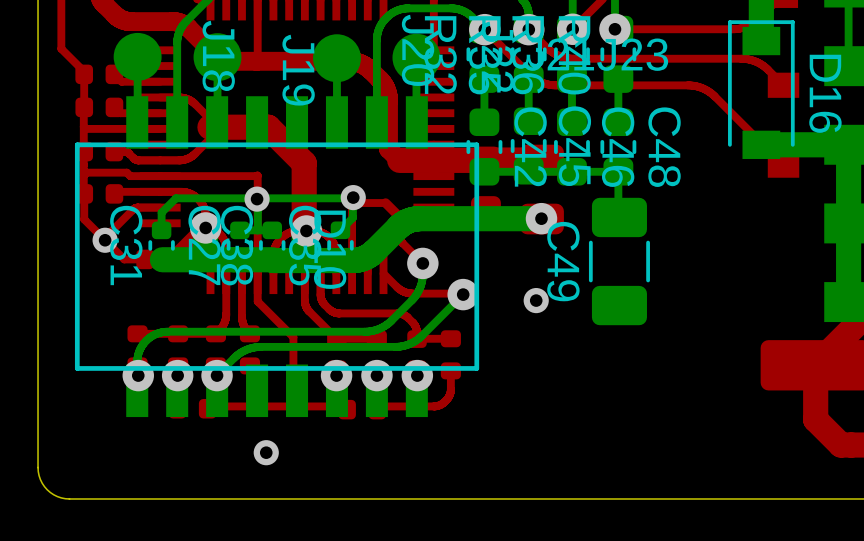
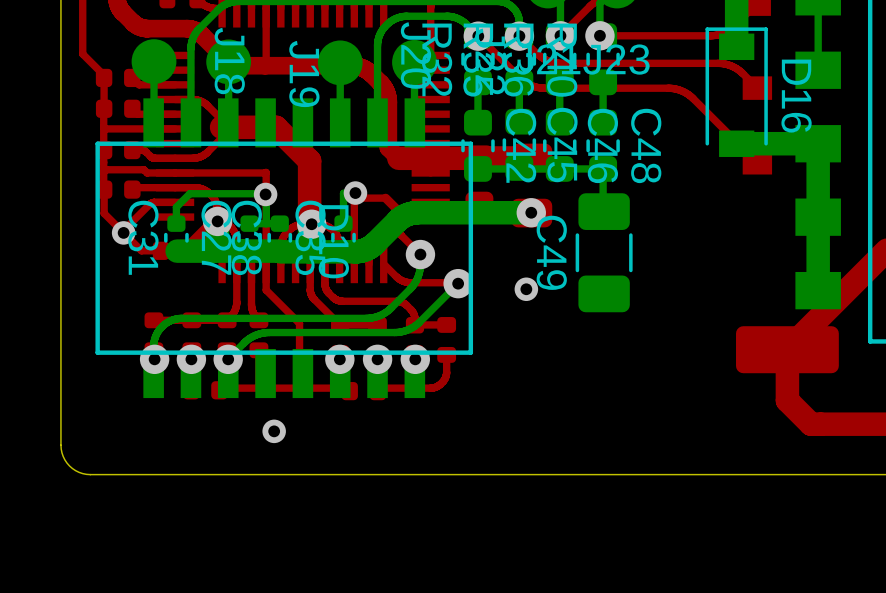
bottom track: (255, 198) (344, 198) (352, 206) (352, 217) (340, 230) -> (343, 193) (343, 223)

